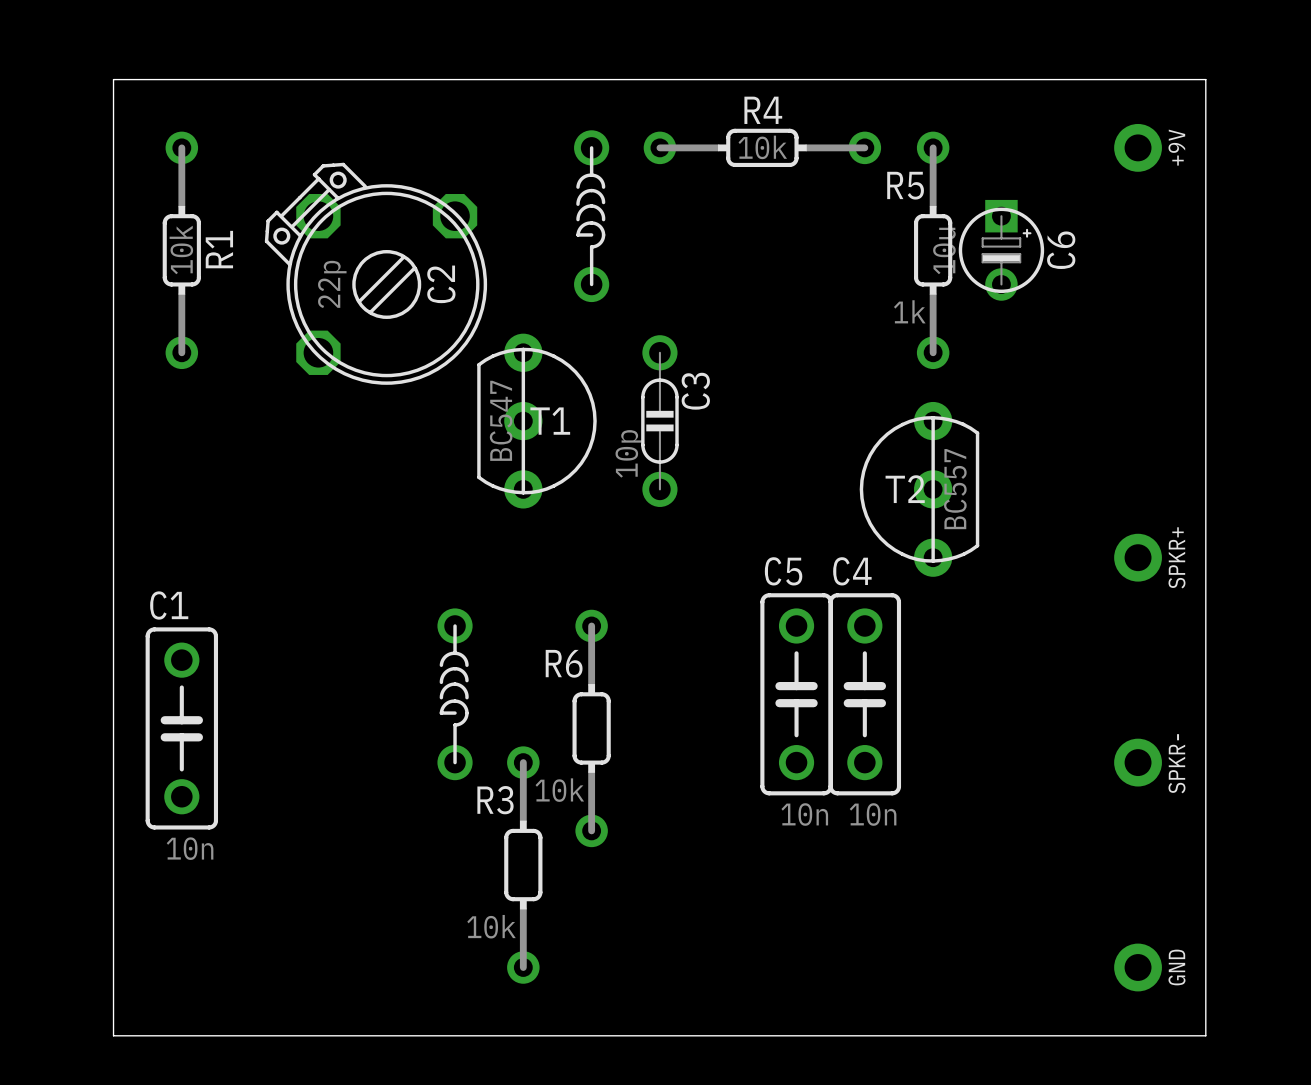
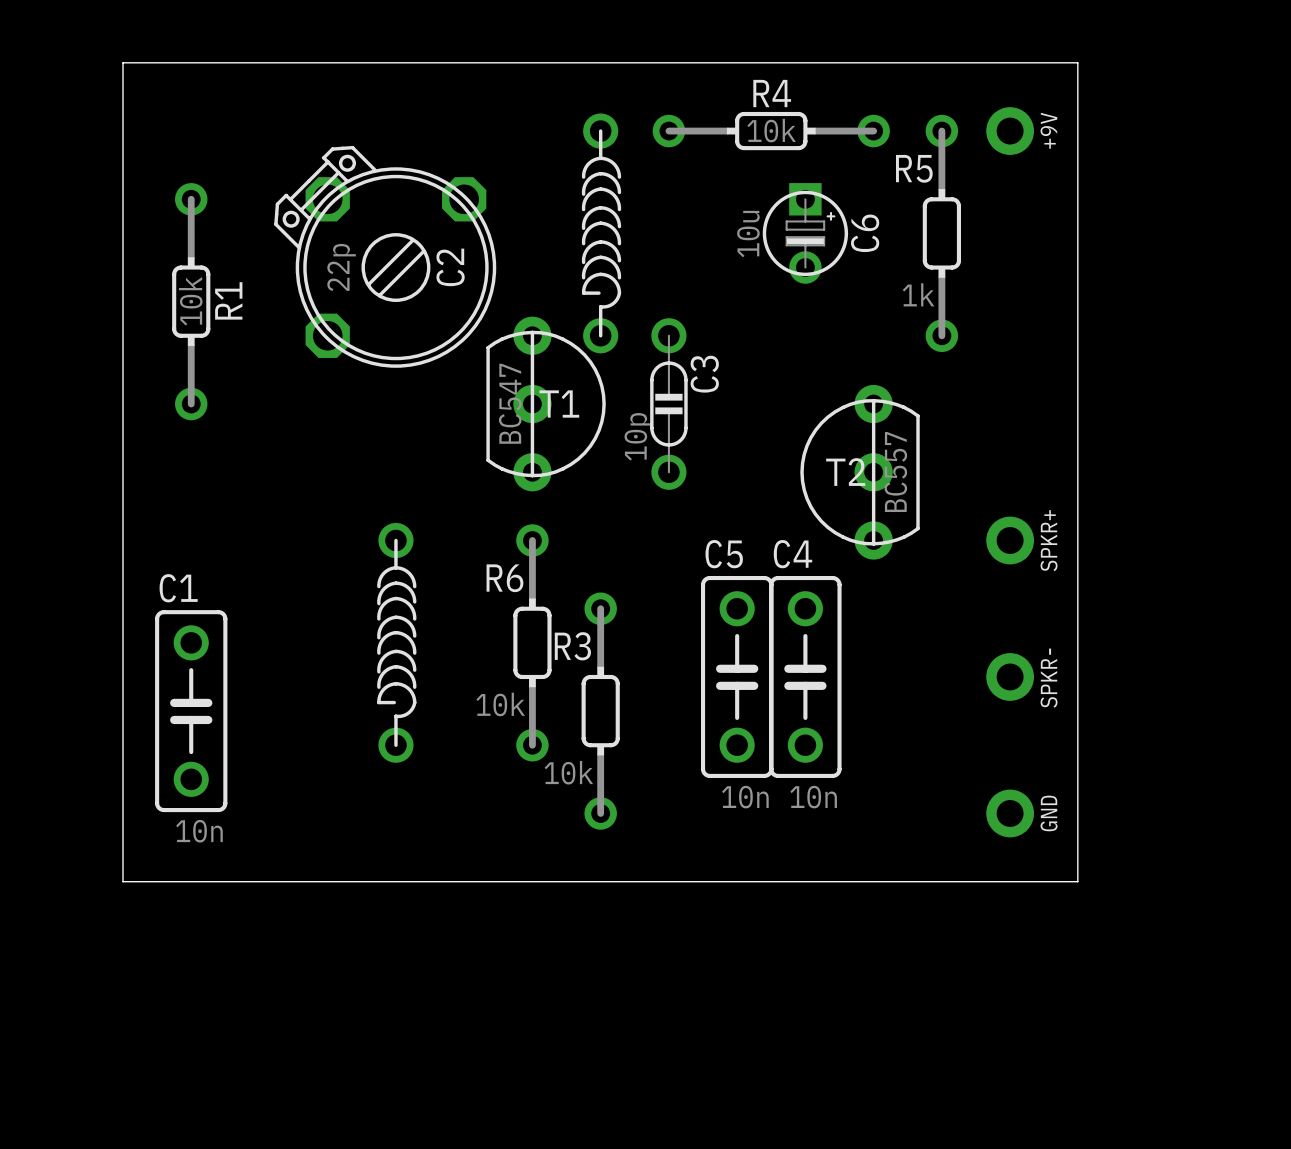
board edge: (1069, 79) (1205, 79) (1205, 1035) (113, 1035) (113, 899) -> (1077, 62) (1077, 881) (122, 881)
+9V position: (1138, 147) -> (1010, 131)
part: (591, 216) -> none
R1 position: (181, 250) -> (191, 301)
part: none -> (601, 233)
C6 position: (1001, 250) -> (805, 233)
T2 position: (919, 489) -> (860, 472)
SPKR+ position: (1138, 557) -> (1010, 540)
C5 name: C5 (783, 571) -> C4 (792, 554)
part: none -> (396, 642)
R6: none -> 10k (532, 642)
R6 name: R6 (564, 663) -> R3 (572, 646)
part: (455, 694) -> none
C5: none -> 10n (737, 676)
C4: 10n (864, 694) -> none
SPKR- position: (1138, 762) -> (1010, 676)
R3: 10k (523, 865) -> none
GND position: (1138, 967) -> (1010, 813)

